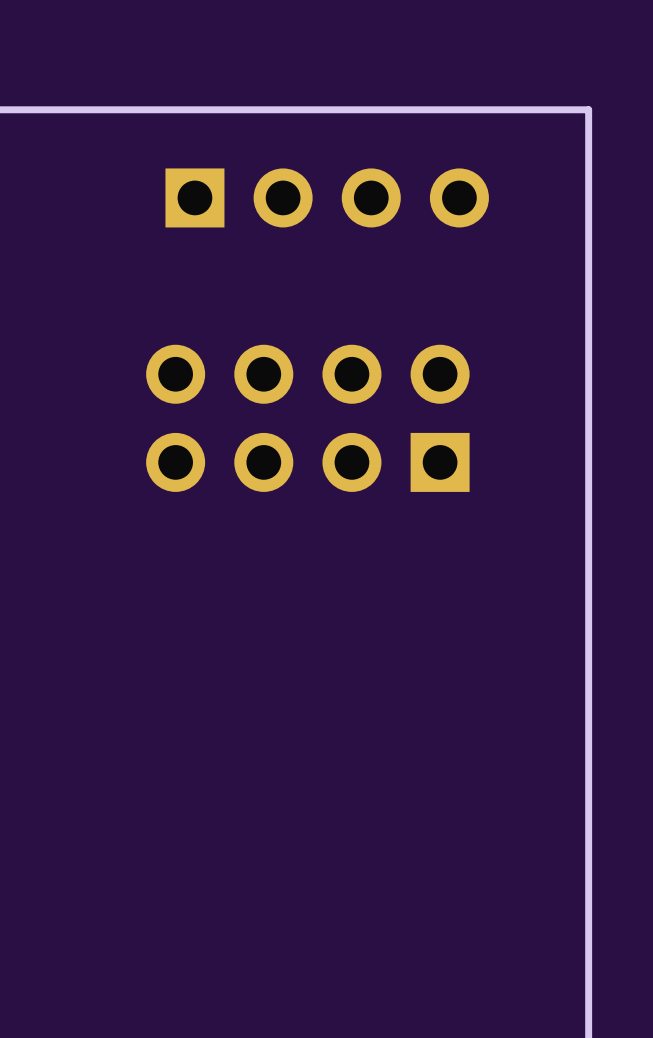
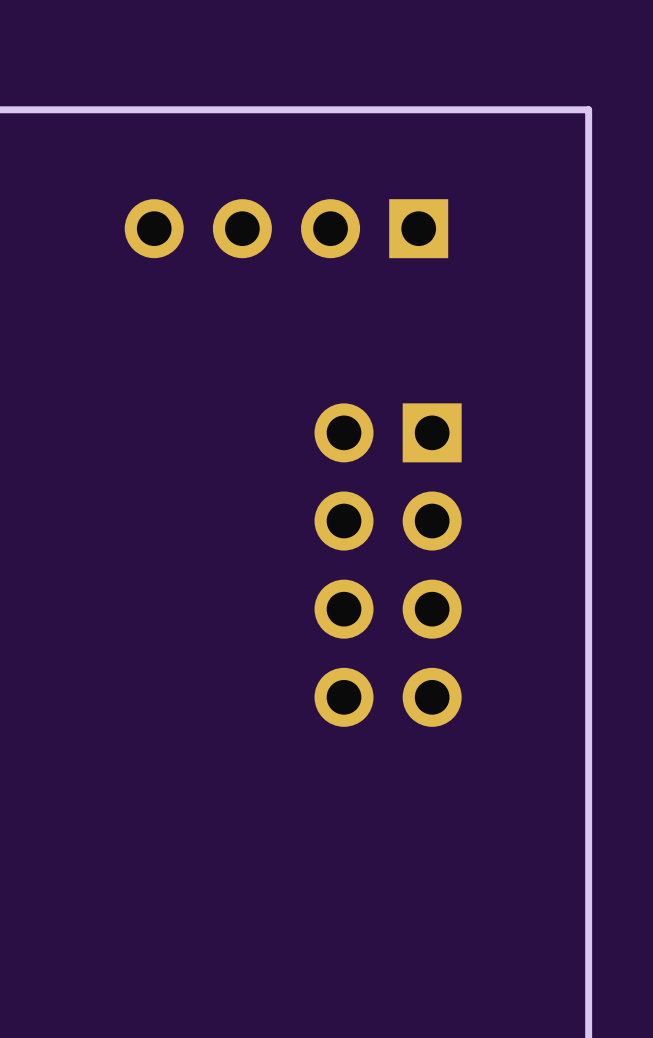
part rotation: 0° (327, 197) -> 180° (286, 228)
part rotation: 0° (307, 418) -> 90° counterclockwise (388, 565)

